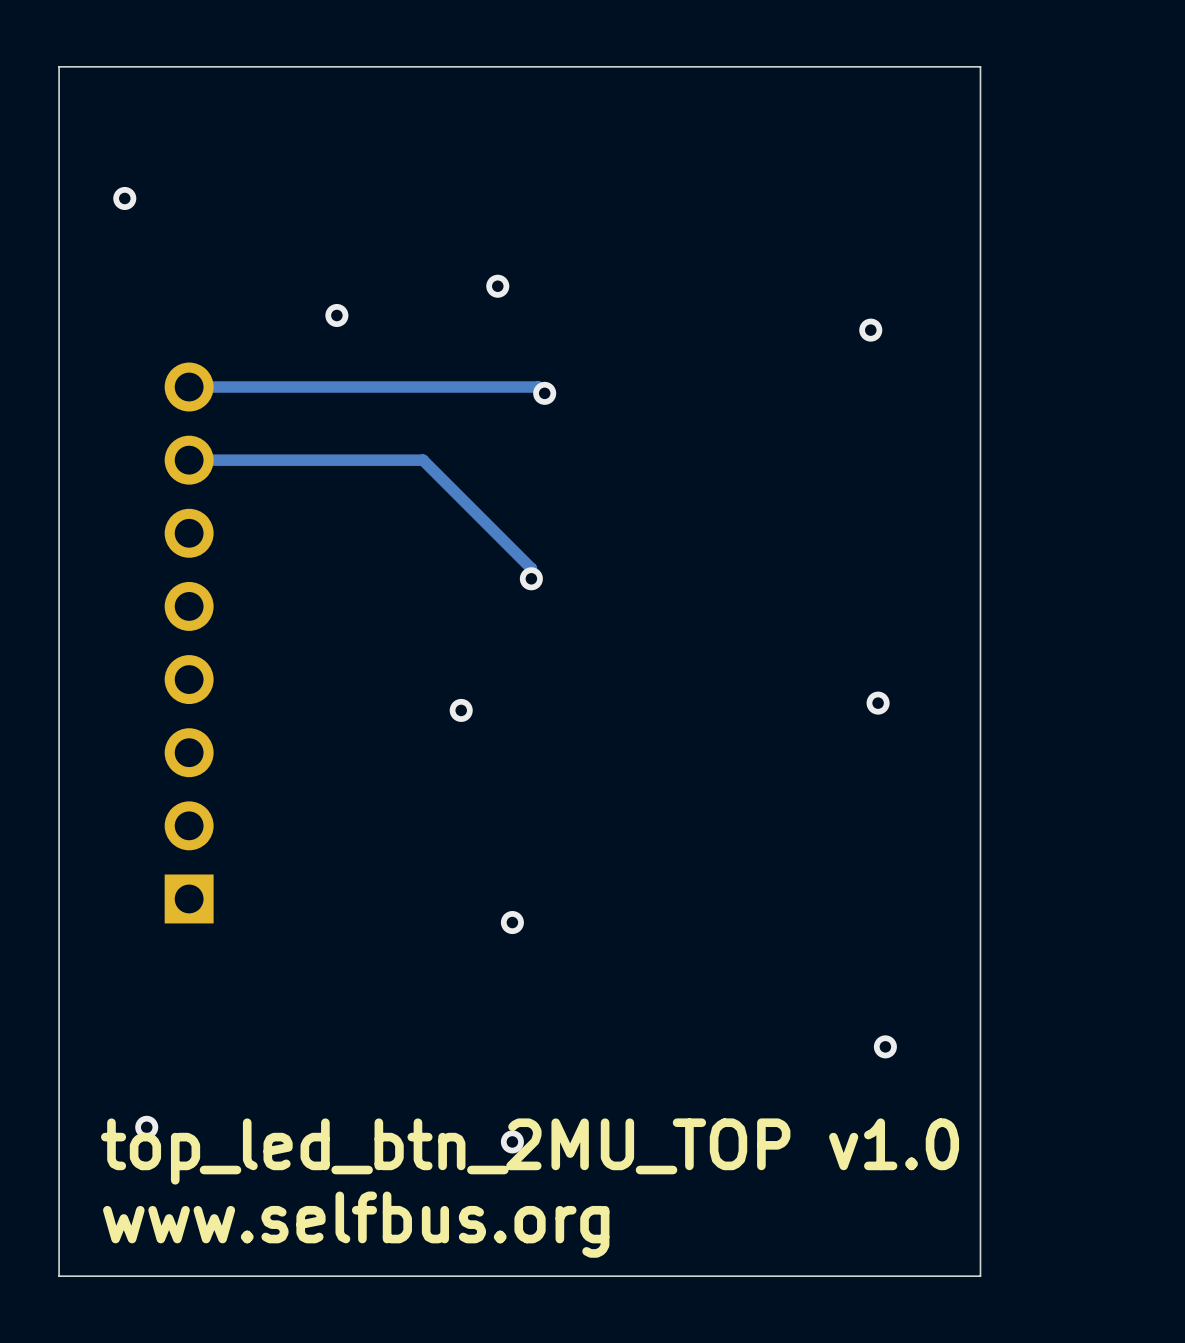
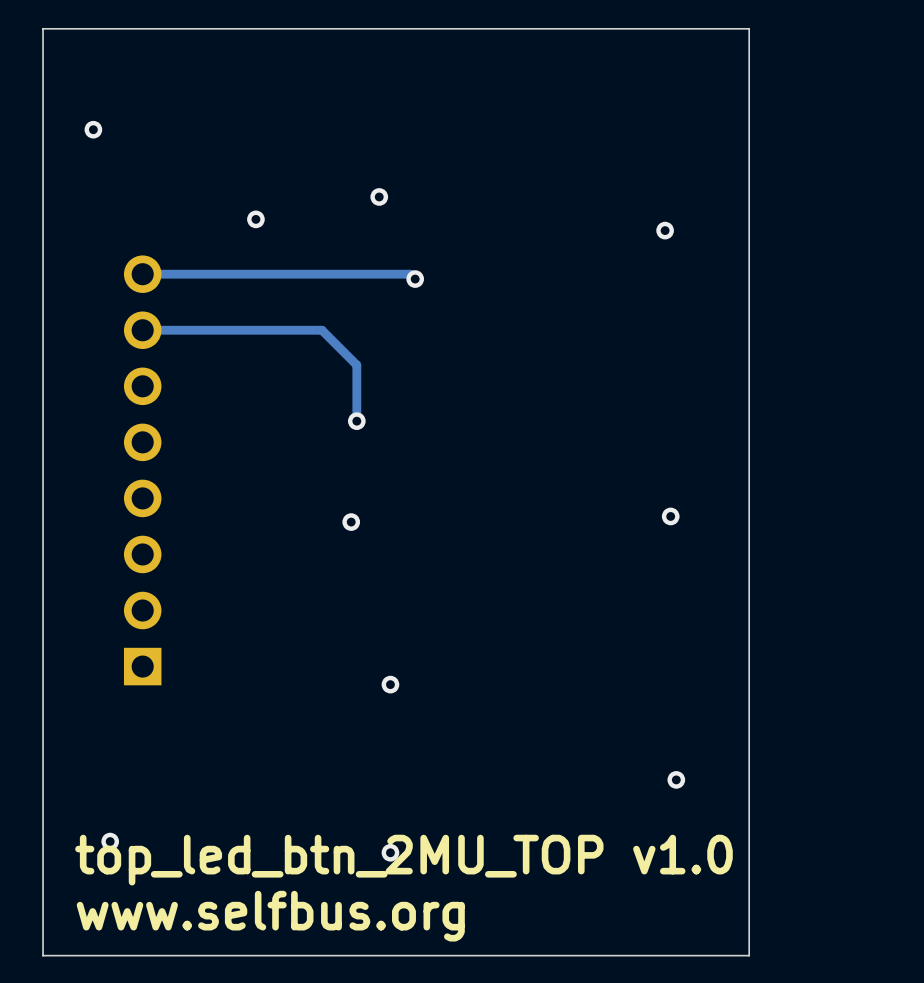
track: (468, 505) (531, 568) (531, 578) -> (356, 365) (356, 421)
via position: (531, 578) -> (356, 421)

